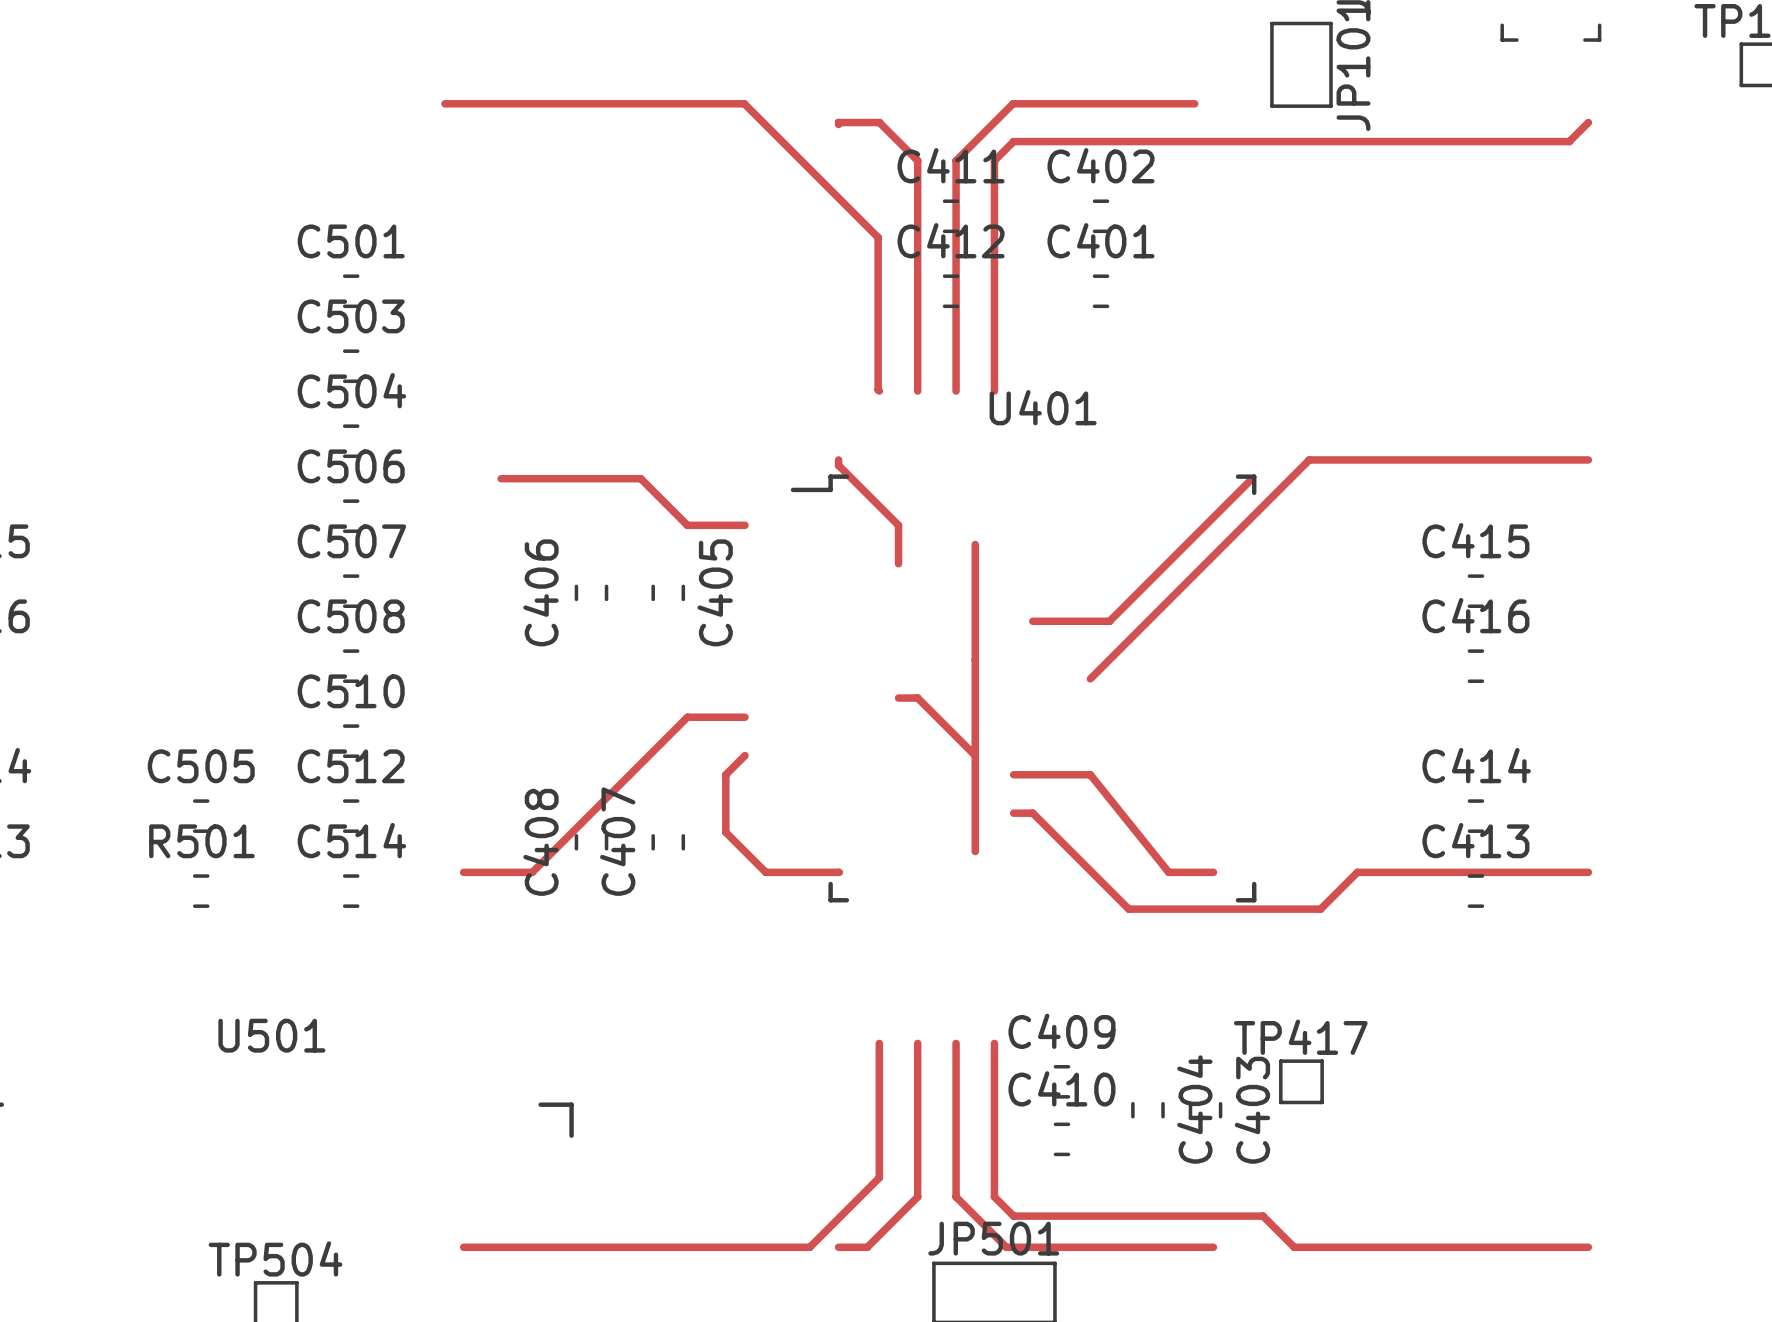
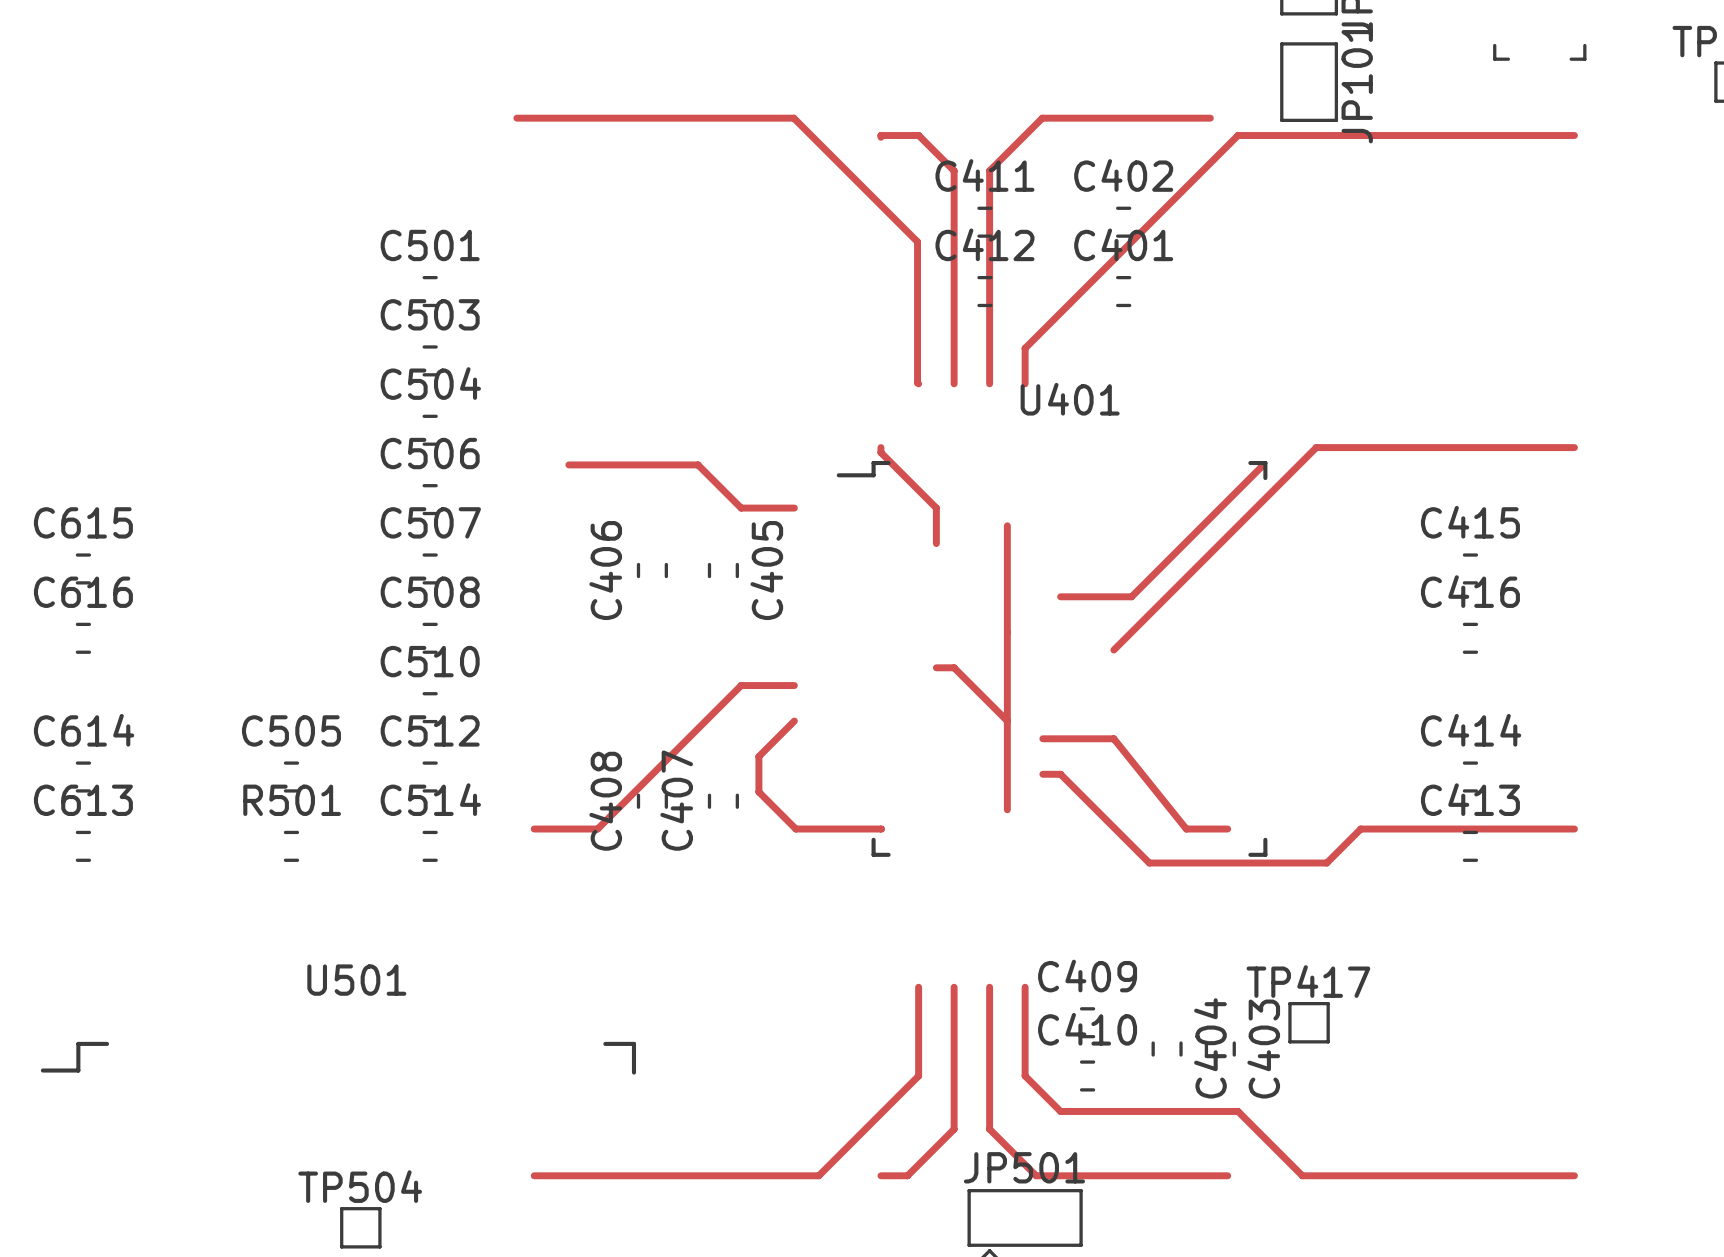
track: (1588, 122) (1569, 141) (1013, 141) (994, 160) (994, 352) -> (1574, 135) (1237, 135) (1025, 348)
track: (725, 774) (725, 832) (765, 872) -> (776, 738) (758, 756) (758, 792) (795, 829) (813, 829)
track: (879, 1139) (879, 1177) (809, 1247) (771, 1247) -> (918, 1075) (818, 1175)
track: (994, 1139) (994, 1196) (1013, 1216) (1263, 1216) -> (1025, 1075) (1060, 1111) (1238, 1111) (1273, 1146)

